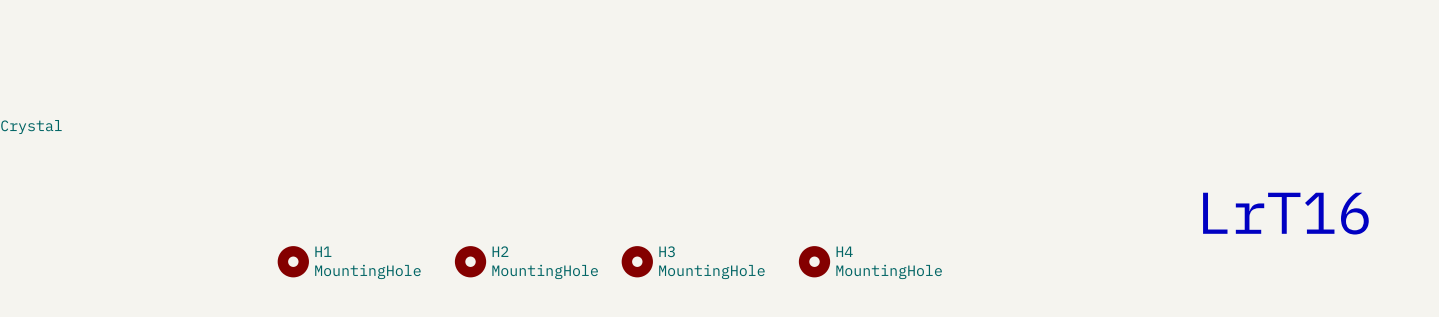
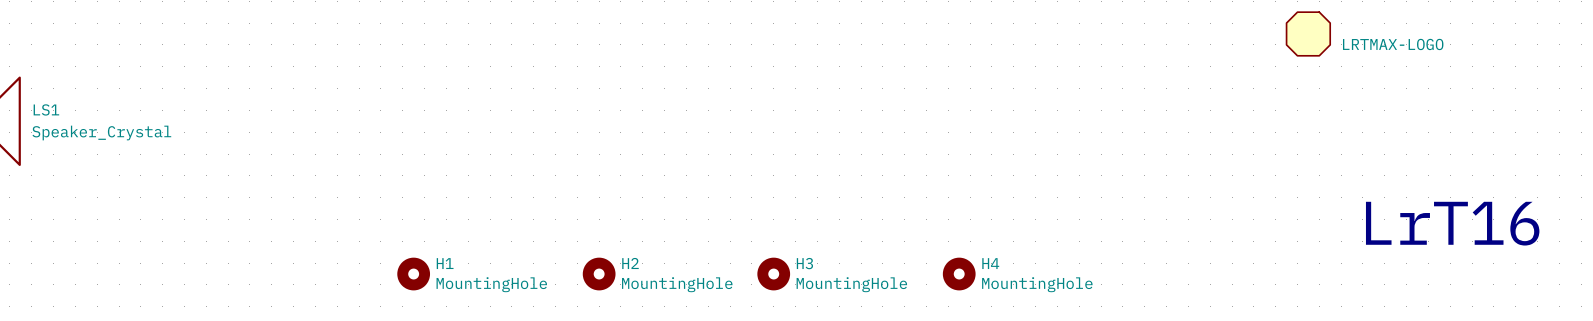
part: none -> LRTMAX-LOGO (1308, 33)

